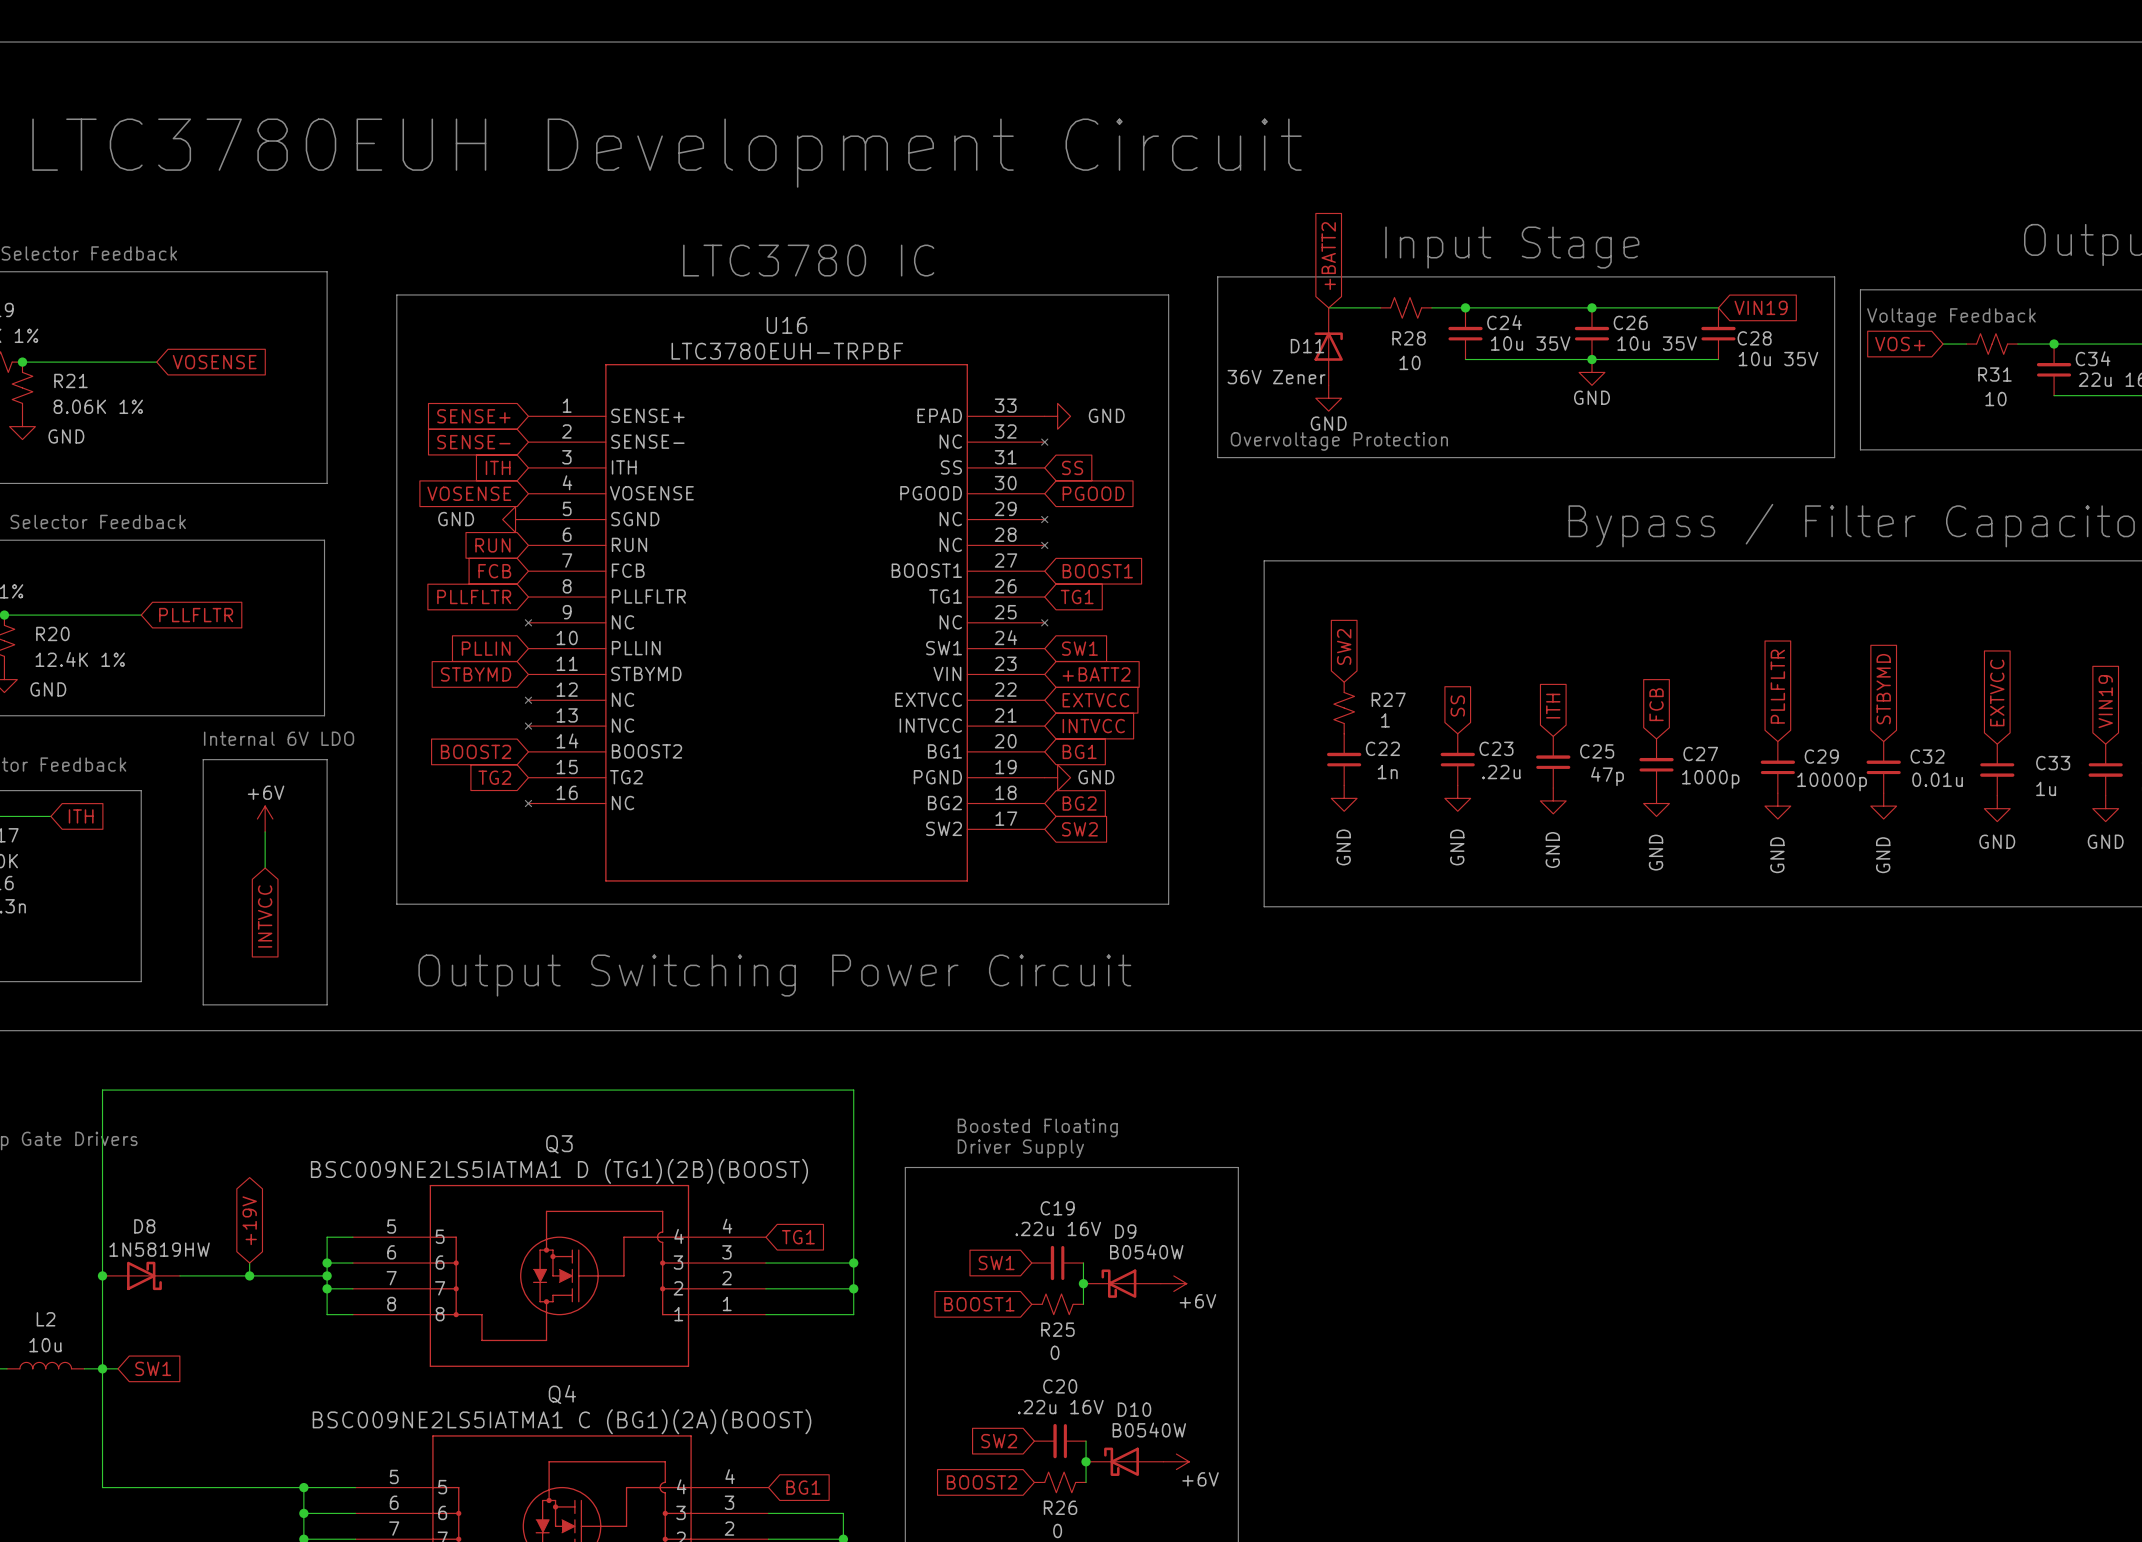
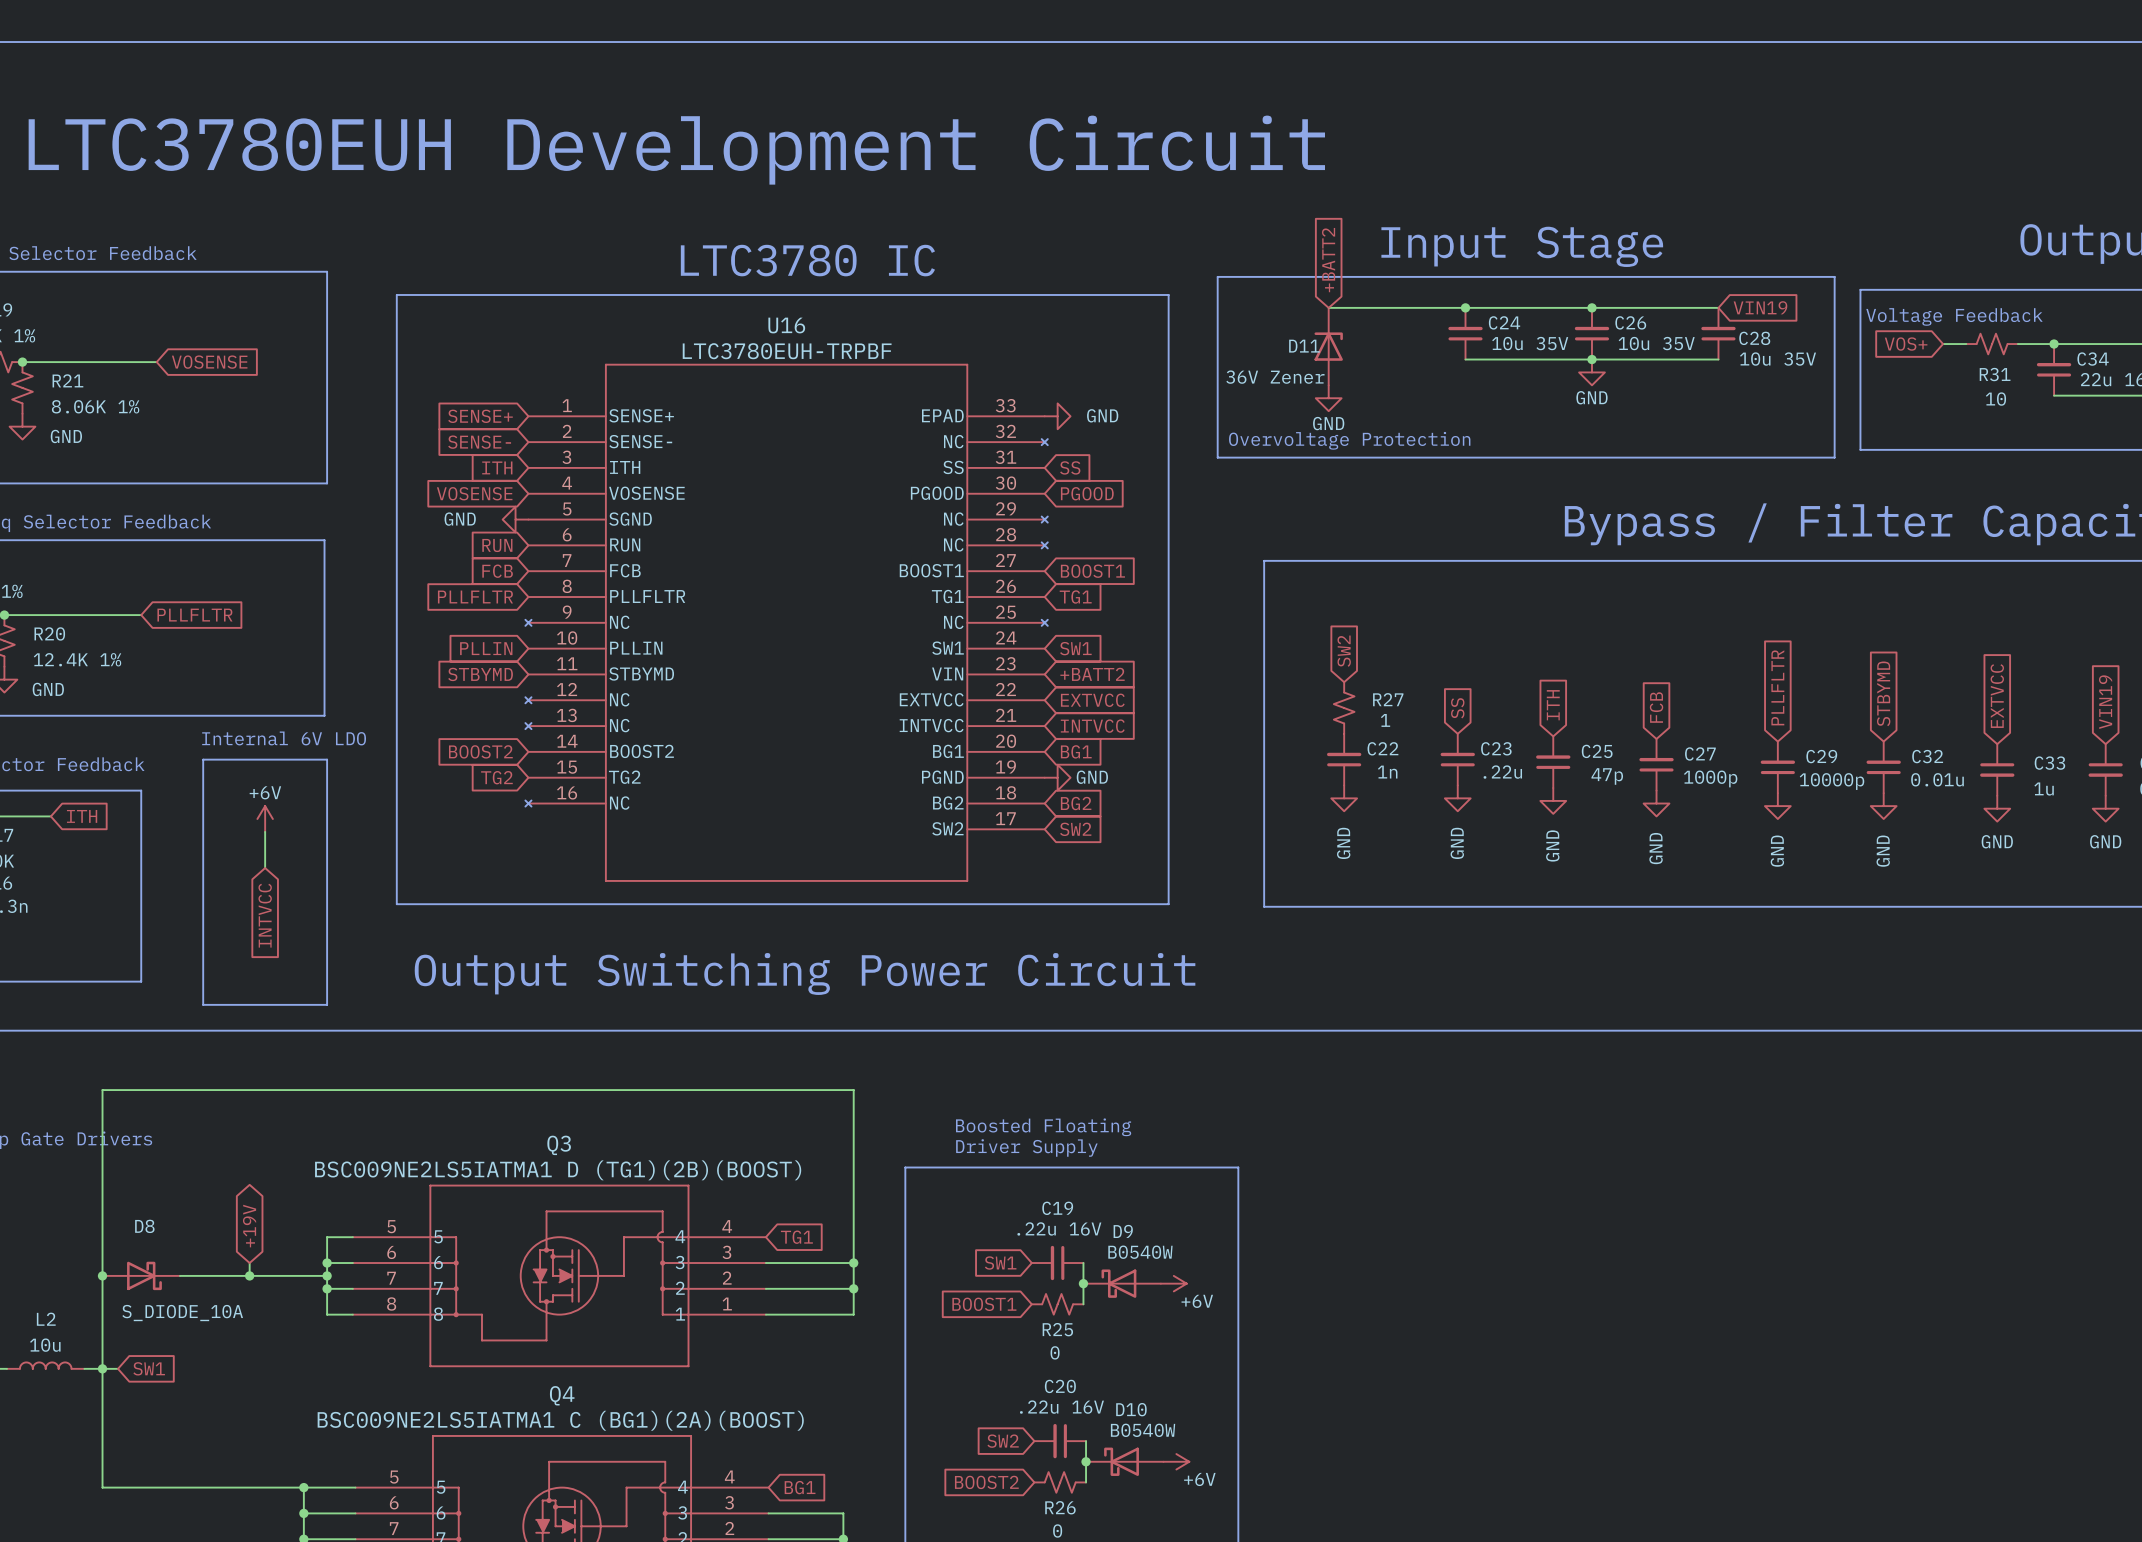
R28: 10 (1406, 307) -> none
D8 value: 1N5819HW (159, 1249) -> S_DIODE_10A (182, 1313)

